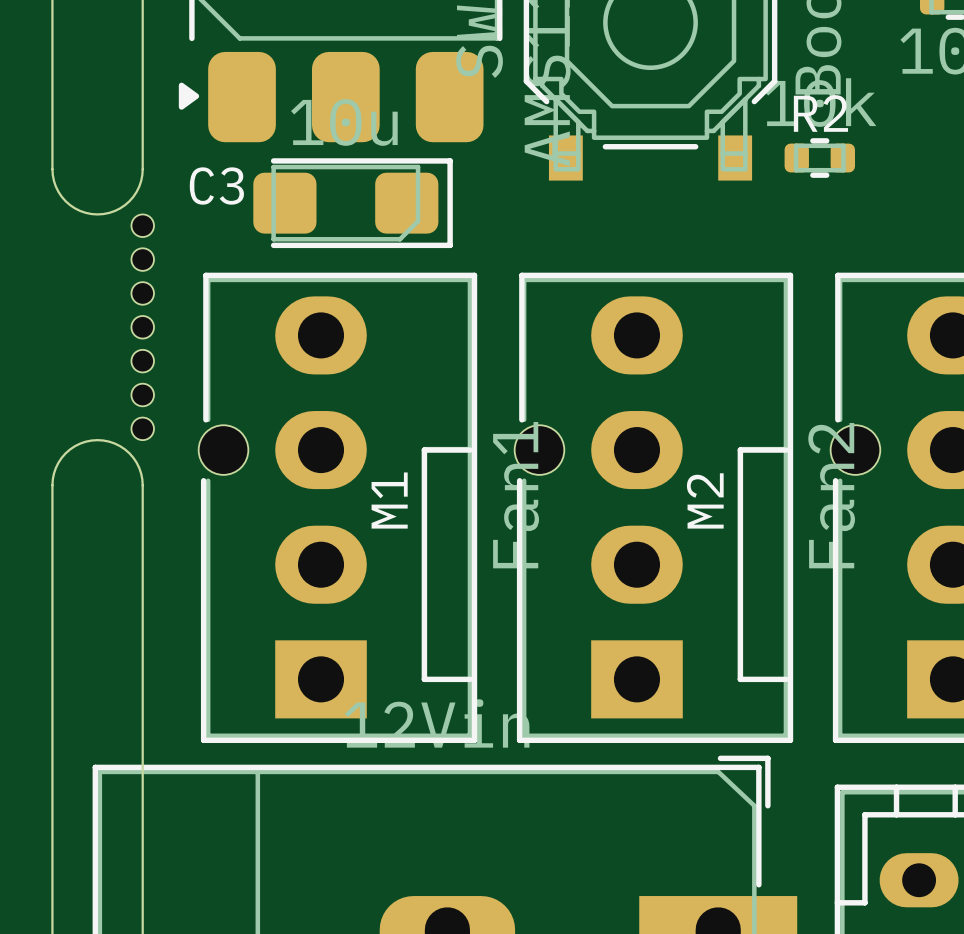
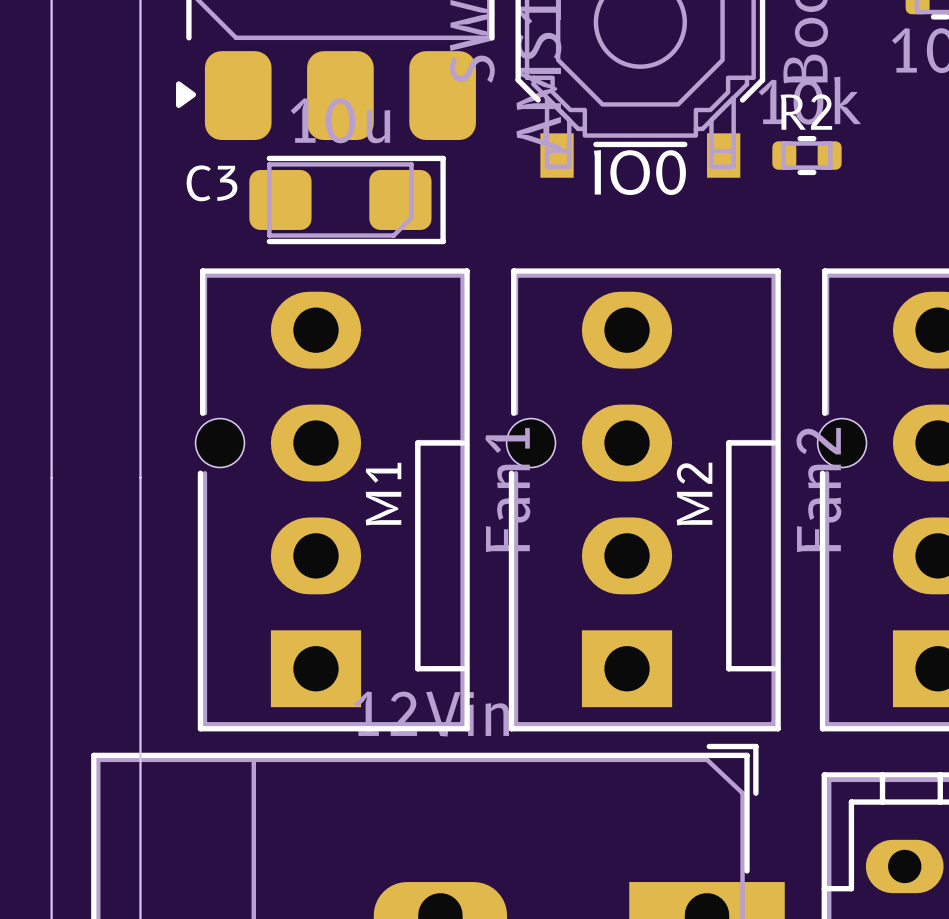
board edge: none -> (51, 166) (51, 477)
board edge: none -> (140, 166) (140, 477)
text: none -> IO0 (639, 172)
part: (102, 327) -> none

